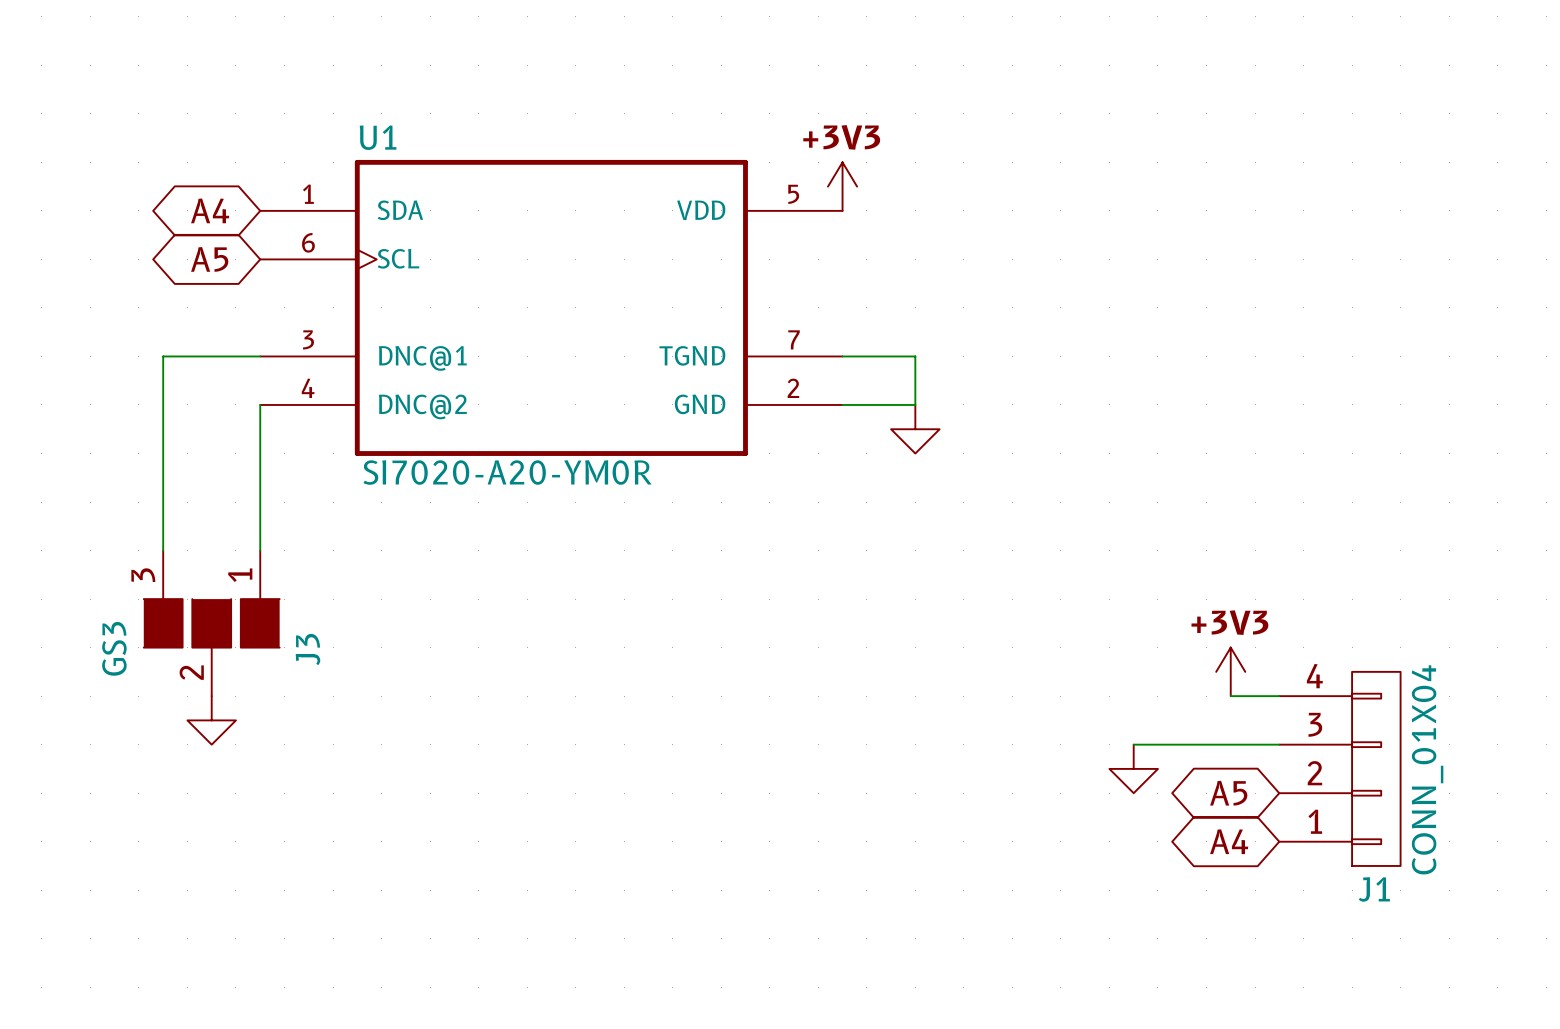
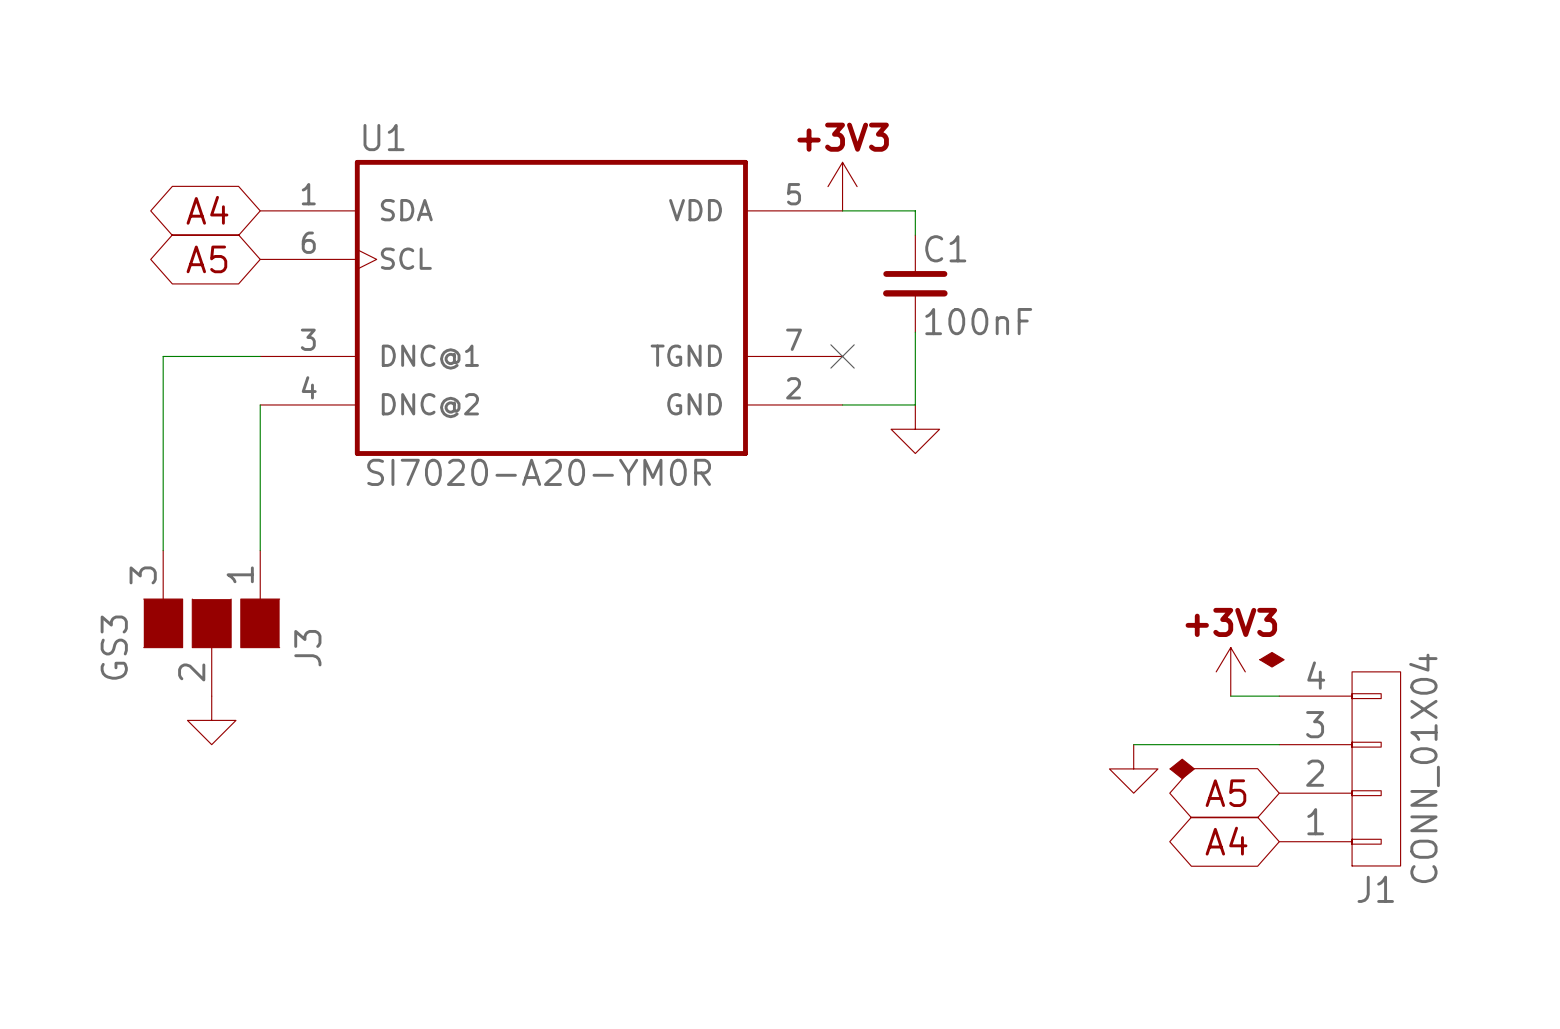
wire: none -> (842, 210) (915, 210) (915, 235)
C1: none -> 100nF (915, 283)
wire: (842, 356) (915, 356) -> (915, 332) (915, 356)
no-connect mark: none -> (842, 356)
power symbol: none -> (1250, 671)
power symbol shape: [1109, 744, 1158, 794] -> [1109, 744, 1195, 794]

